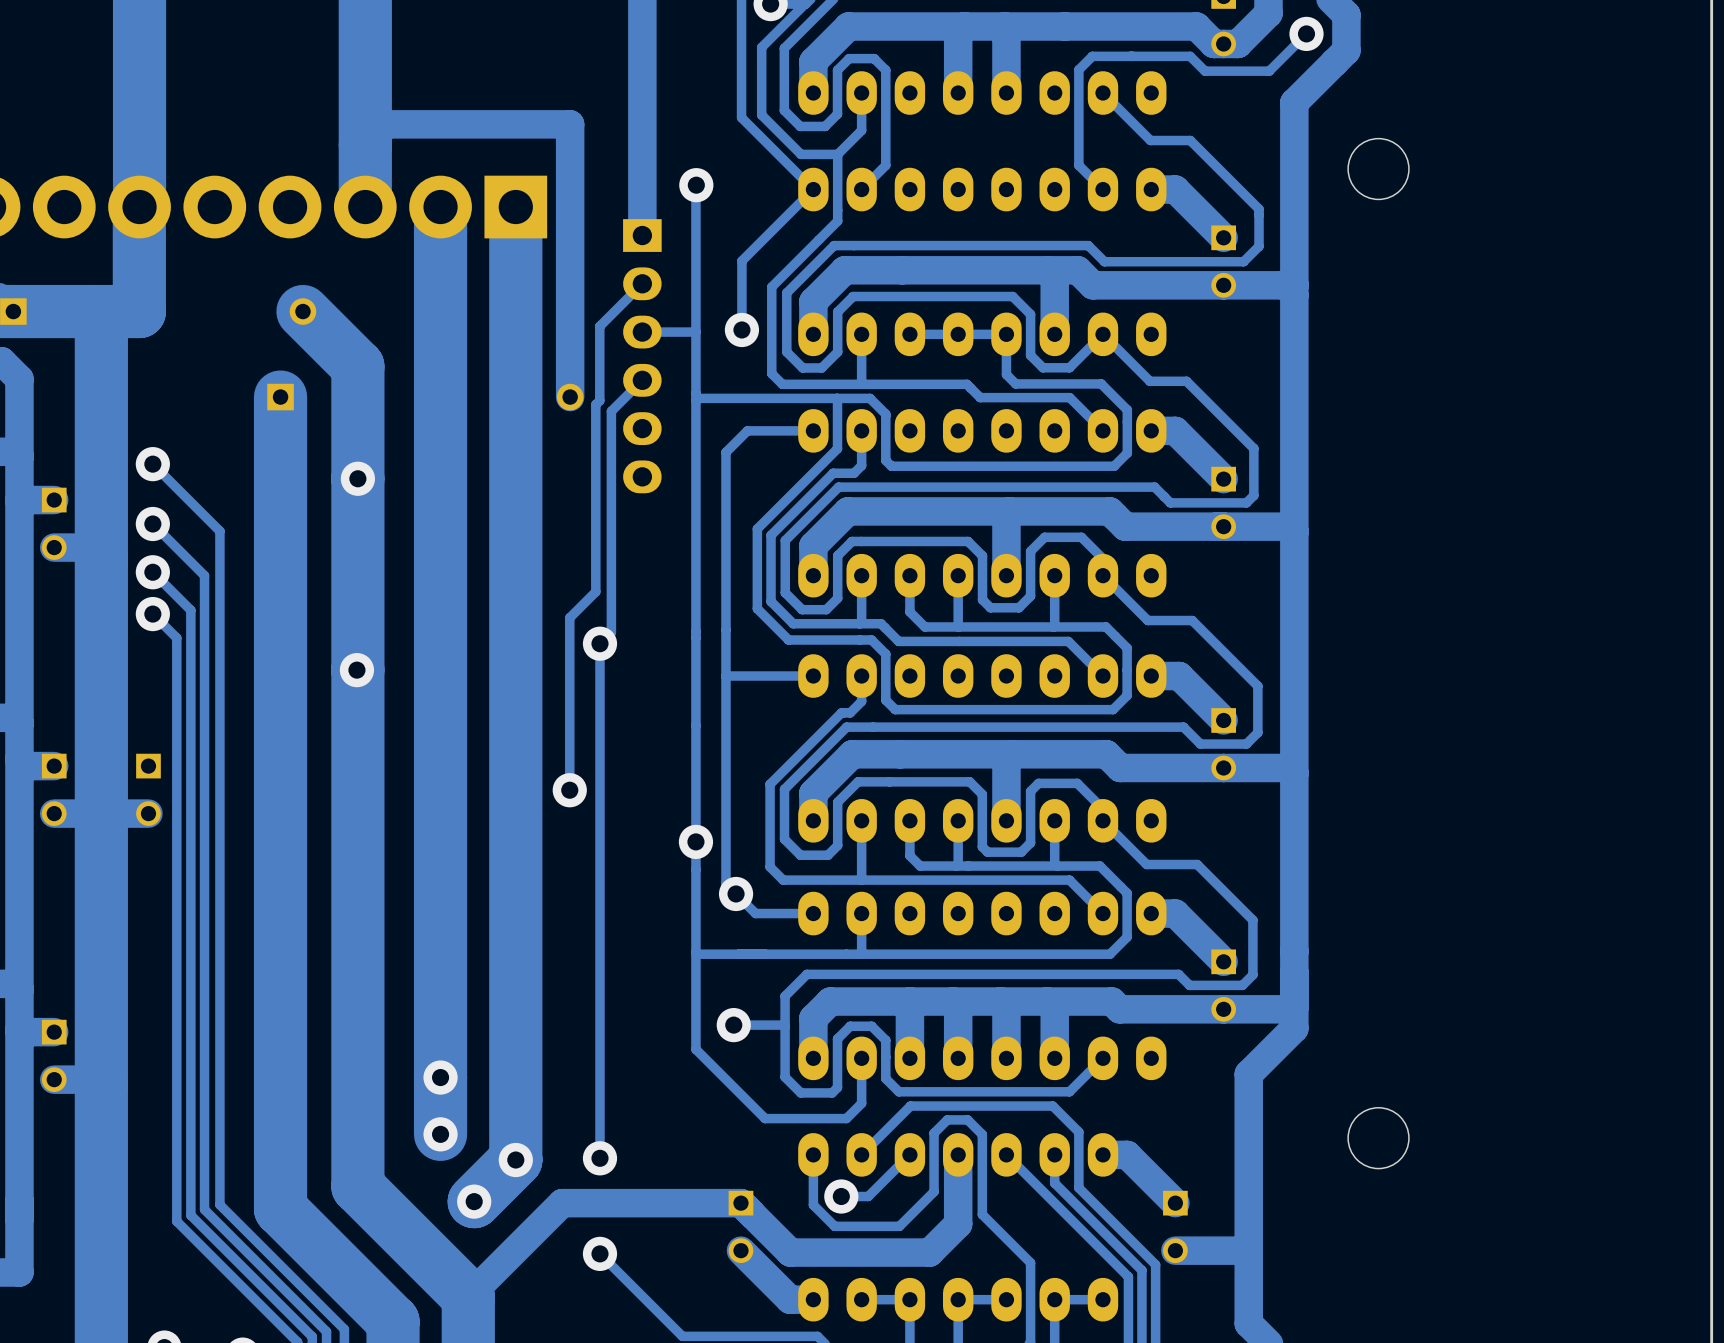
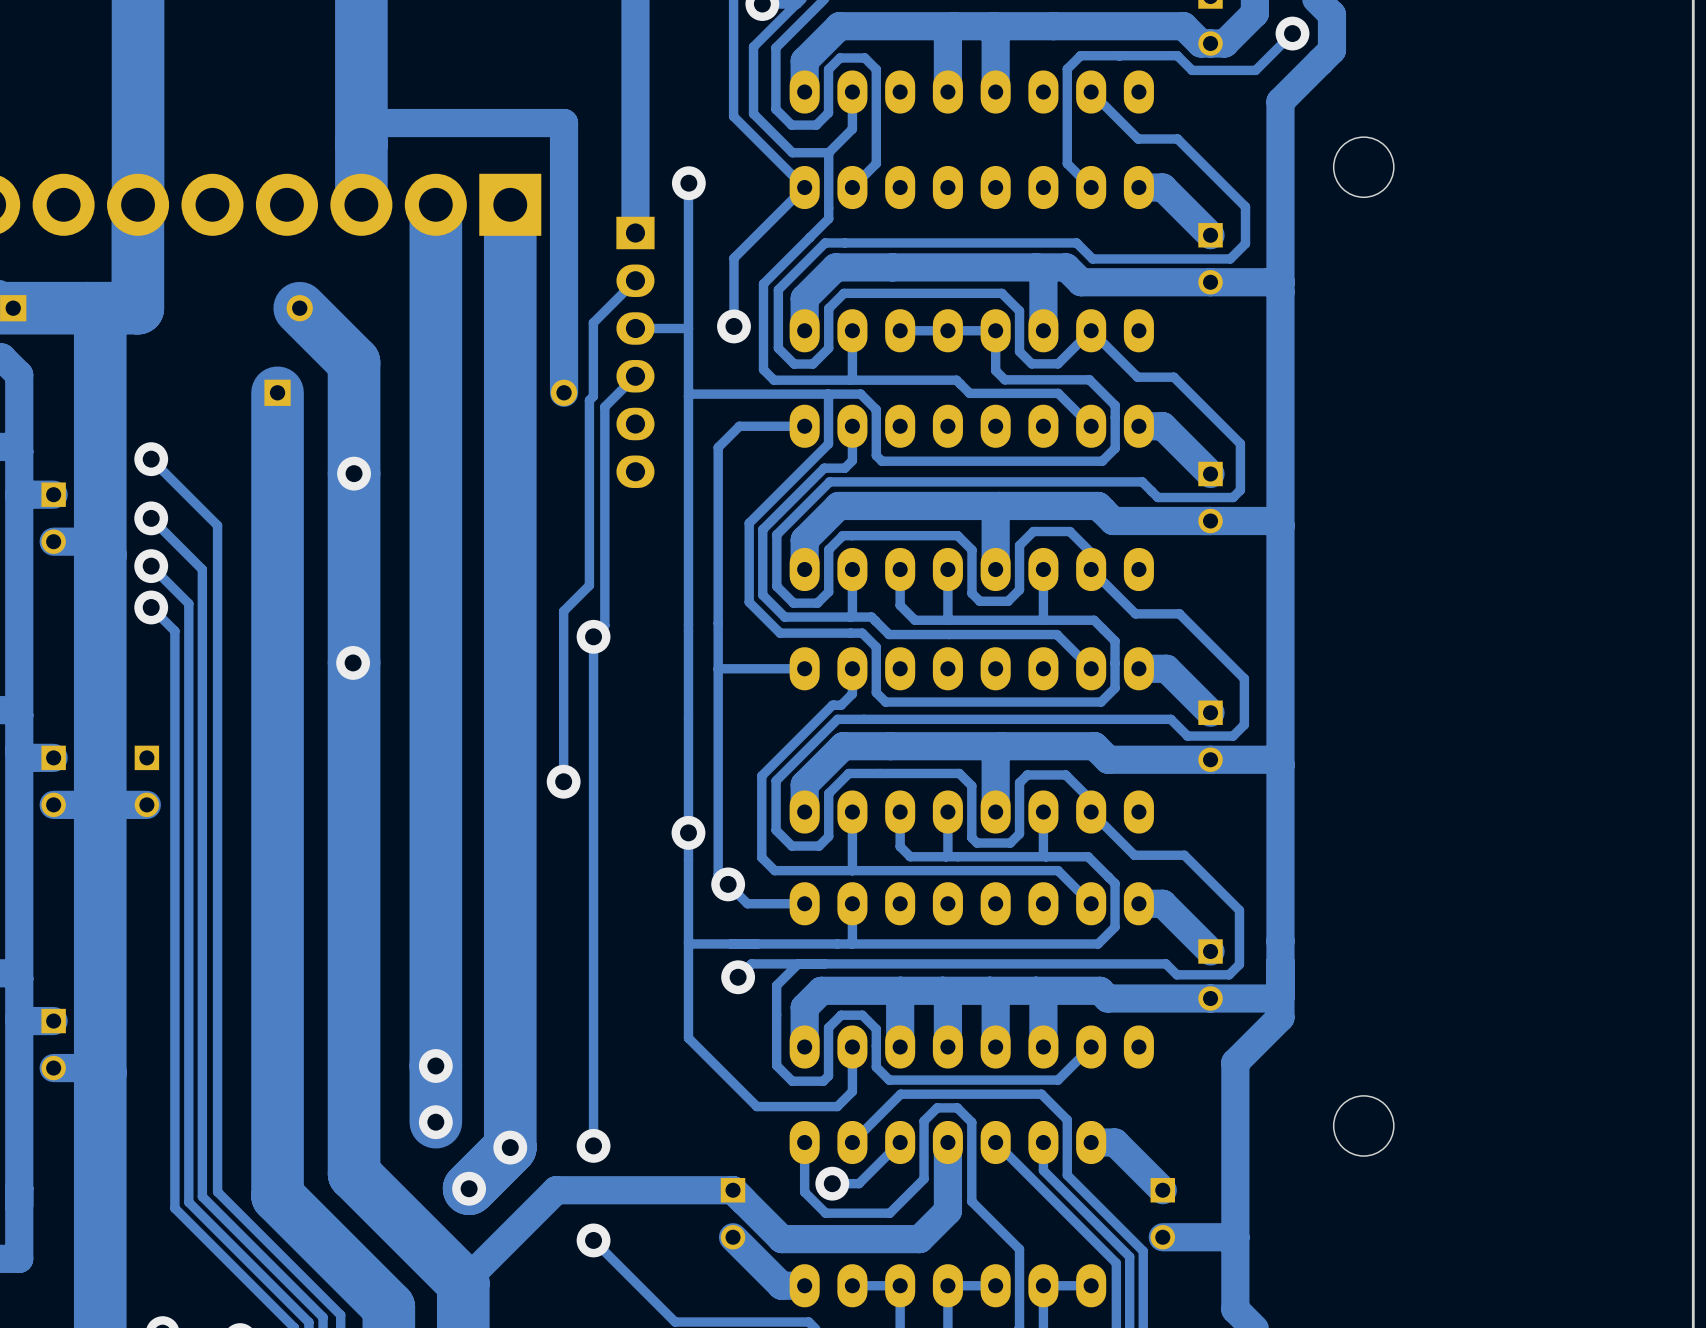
track: none -> (798, 963) (751, 963) (738, 977)
track: (733, 1025) (785, 1026) -> none
via position: (733, 1025) -> (738, 977)

